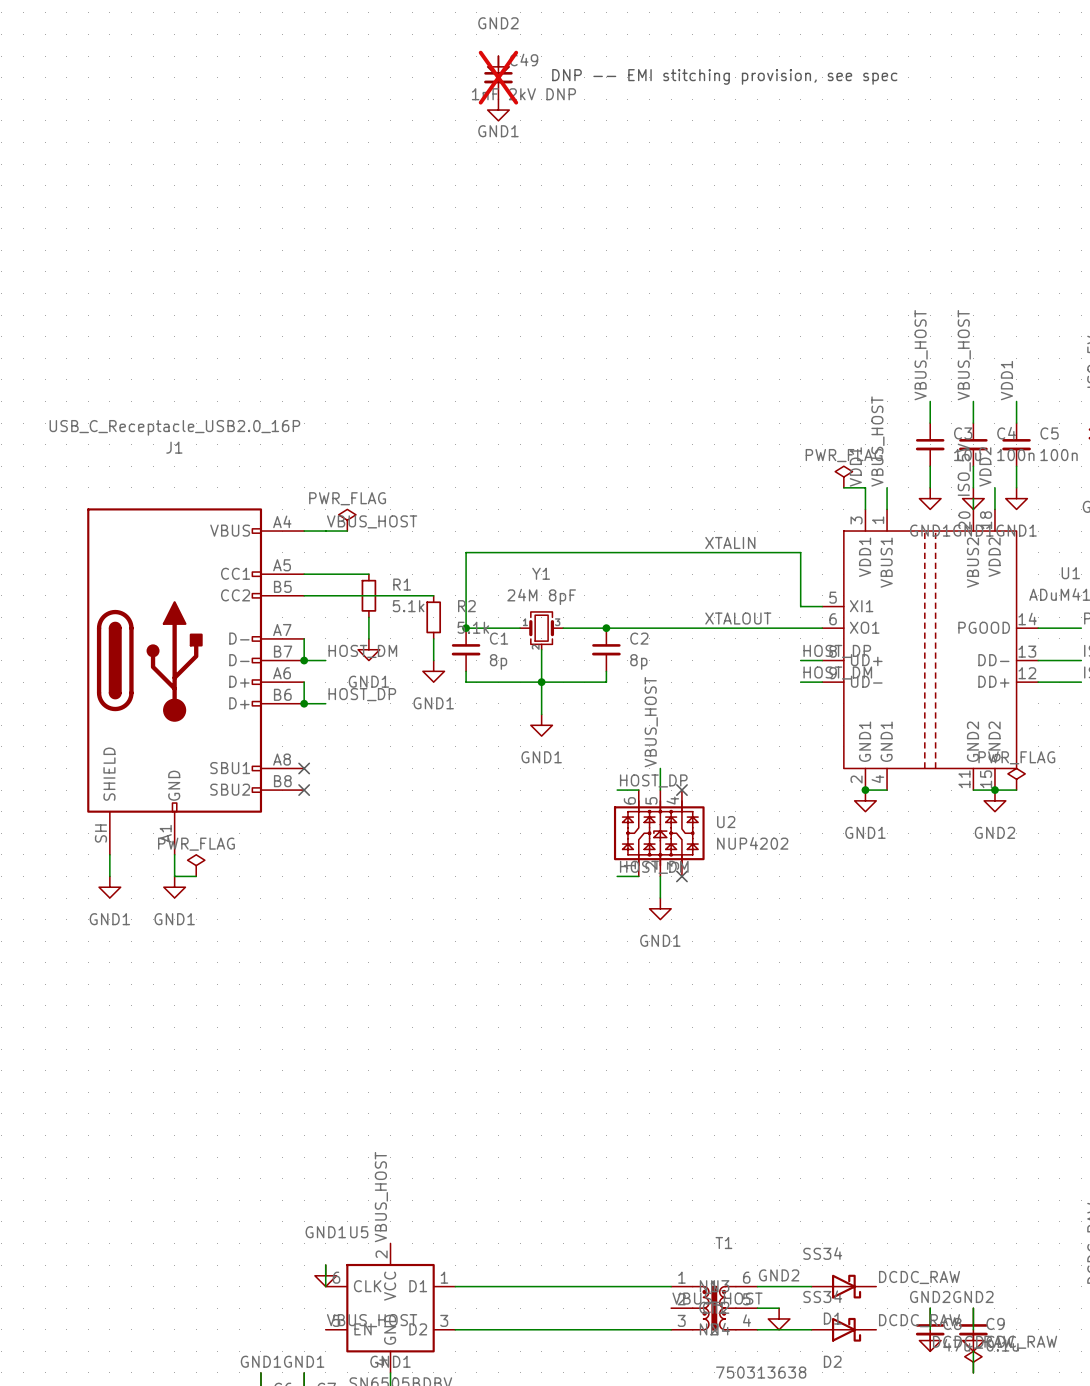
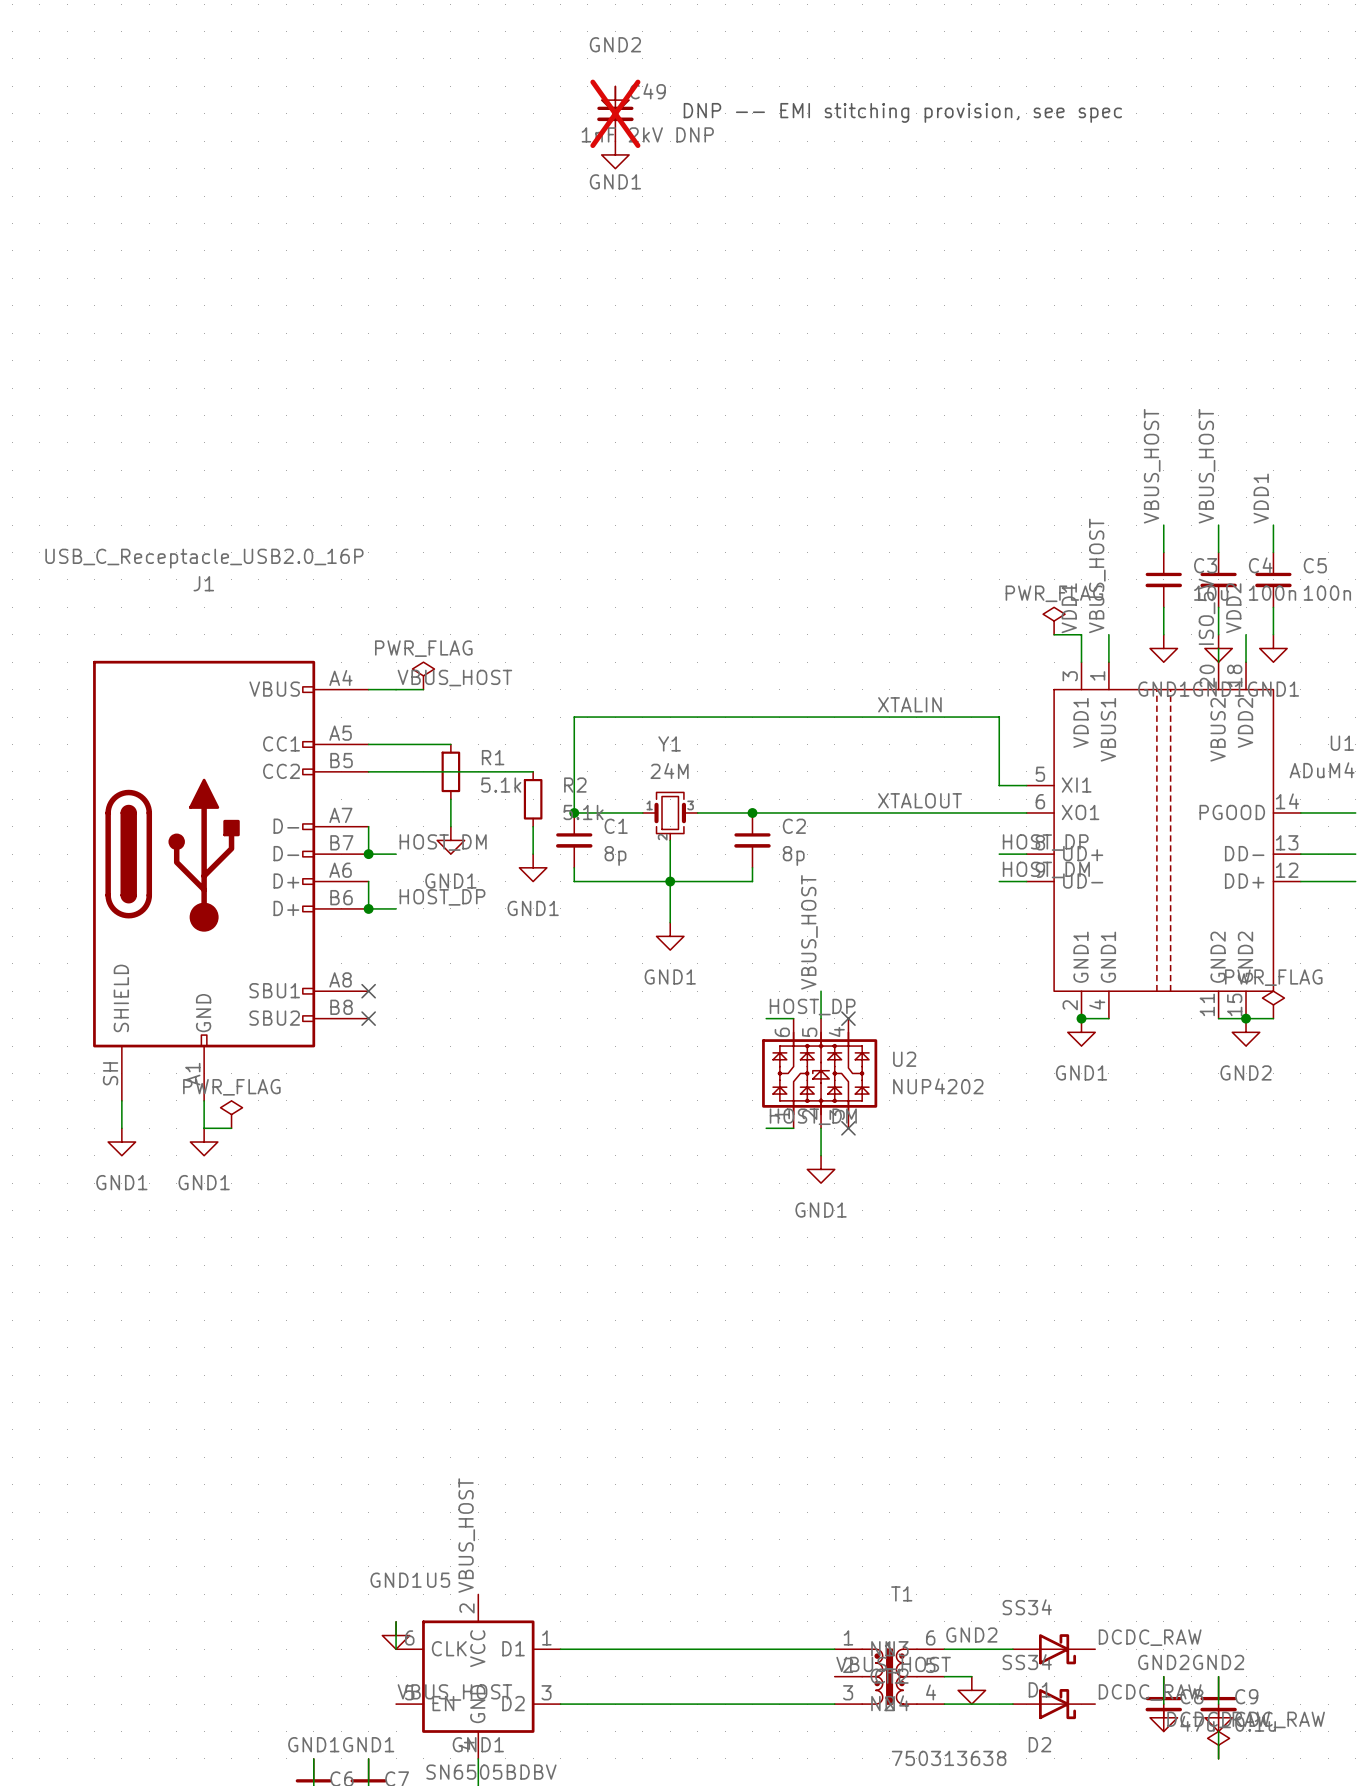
Y1 value: 24M 8pF (541, 596) -> 24M (669, 771)

